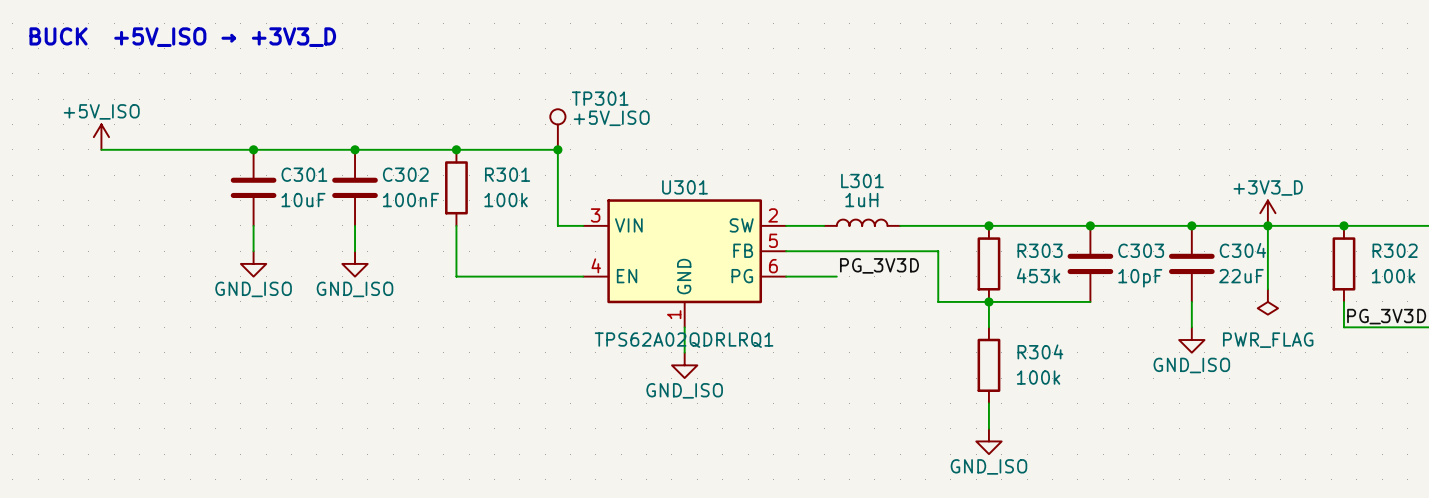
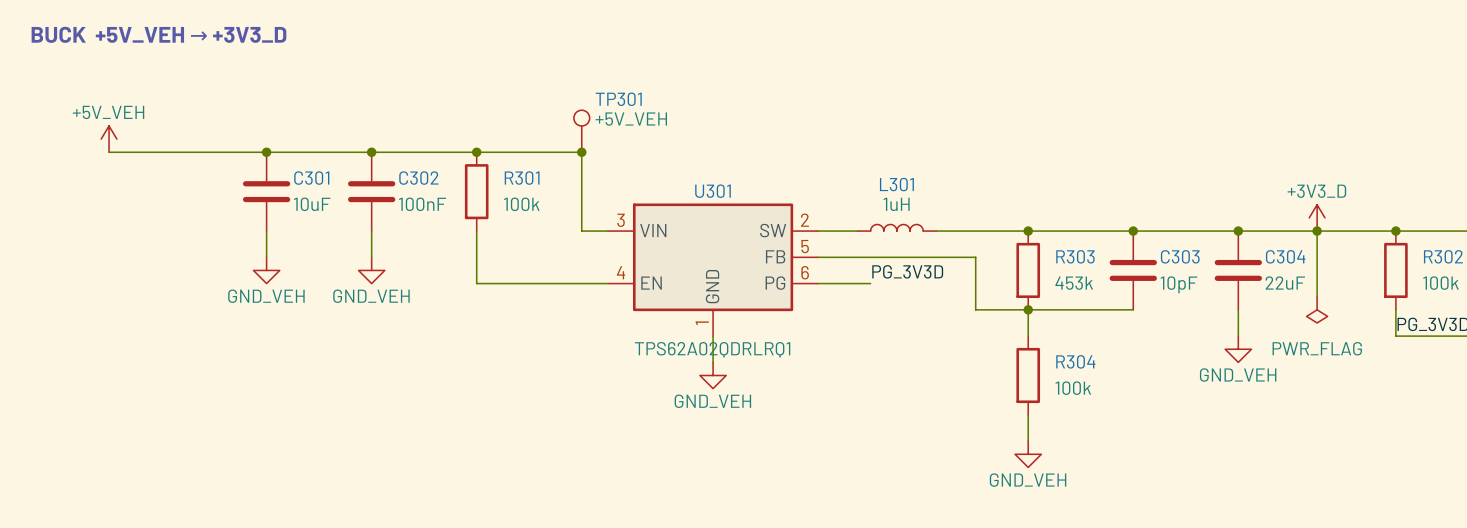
text: BUCK +5V_ISO → +3V3_D (182, 37) -> BUCK +5V_VEH → +3V3_D (158, 34)
TP301 value: +5V_ISO (611, 118) -> +5V_VEH (631, 119)
power symbol: +5V_ISO (101, 137) -> +5V_VEH (109, 139)
power symbol: GND_ISO (253, 263) -> GND_VEH (266, 270)
power symbol: GND_ISO (355, 263) -> GND_VEH (371, 270)
power symbol: GND_ISO (1191, 340) -> GND_VEH (1238, 349)
power symbol: GND_ISO (684, 365) -> GND_VEH (713, 375)
power symbol: GND_ISO (988, 441) -> GND_VEH (1028, 454)

